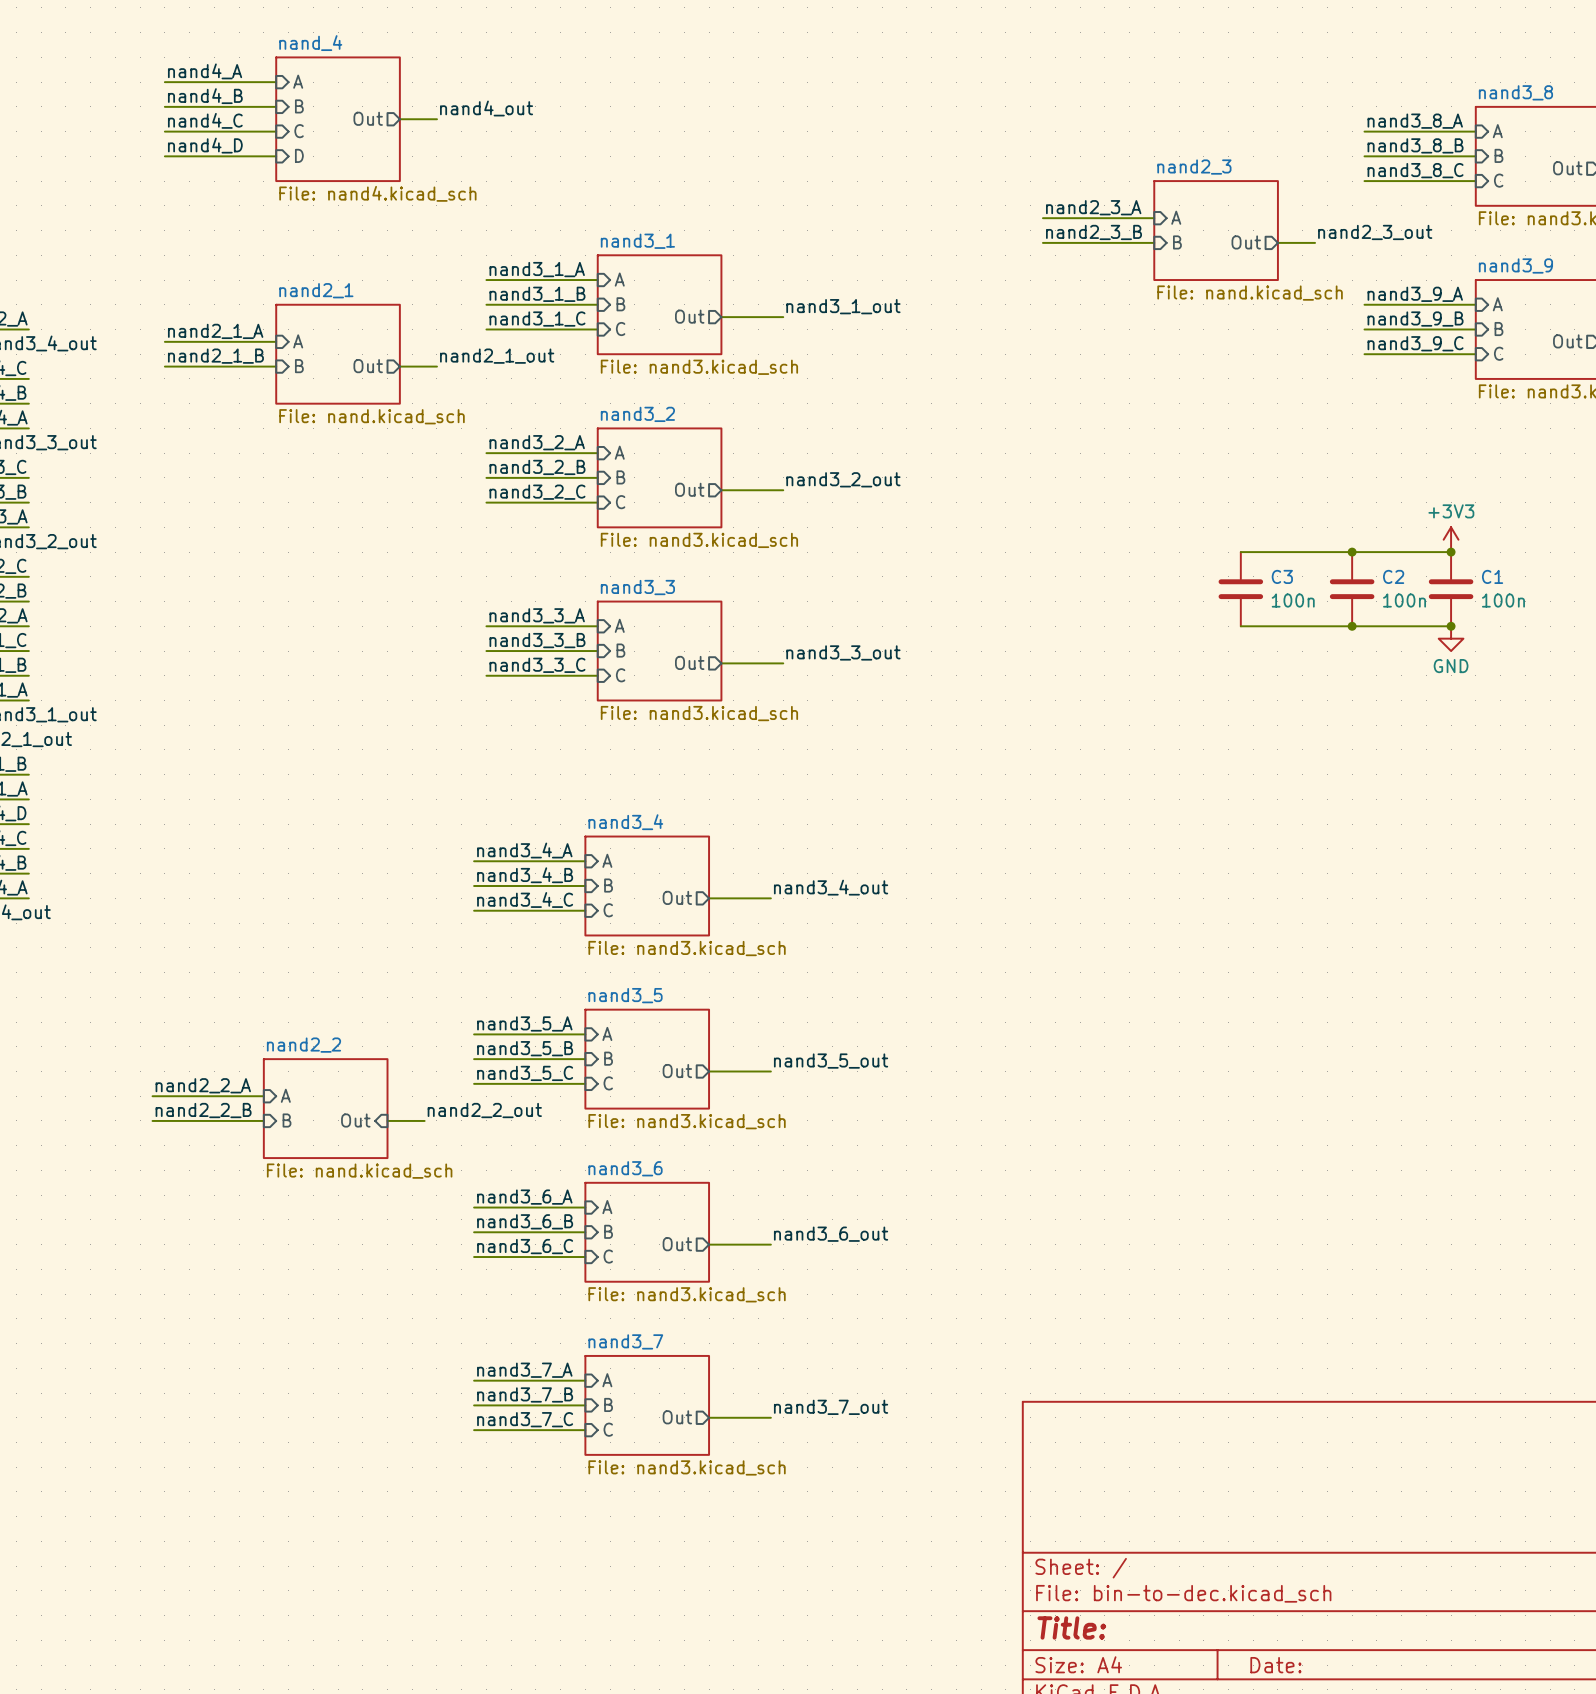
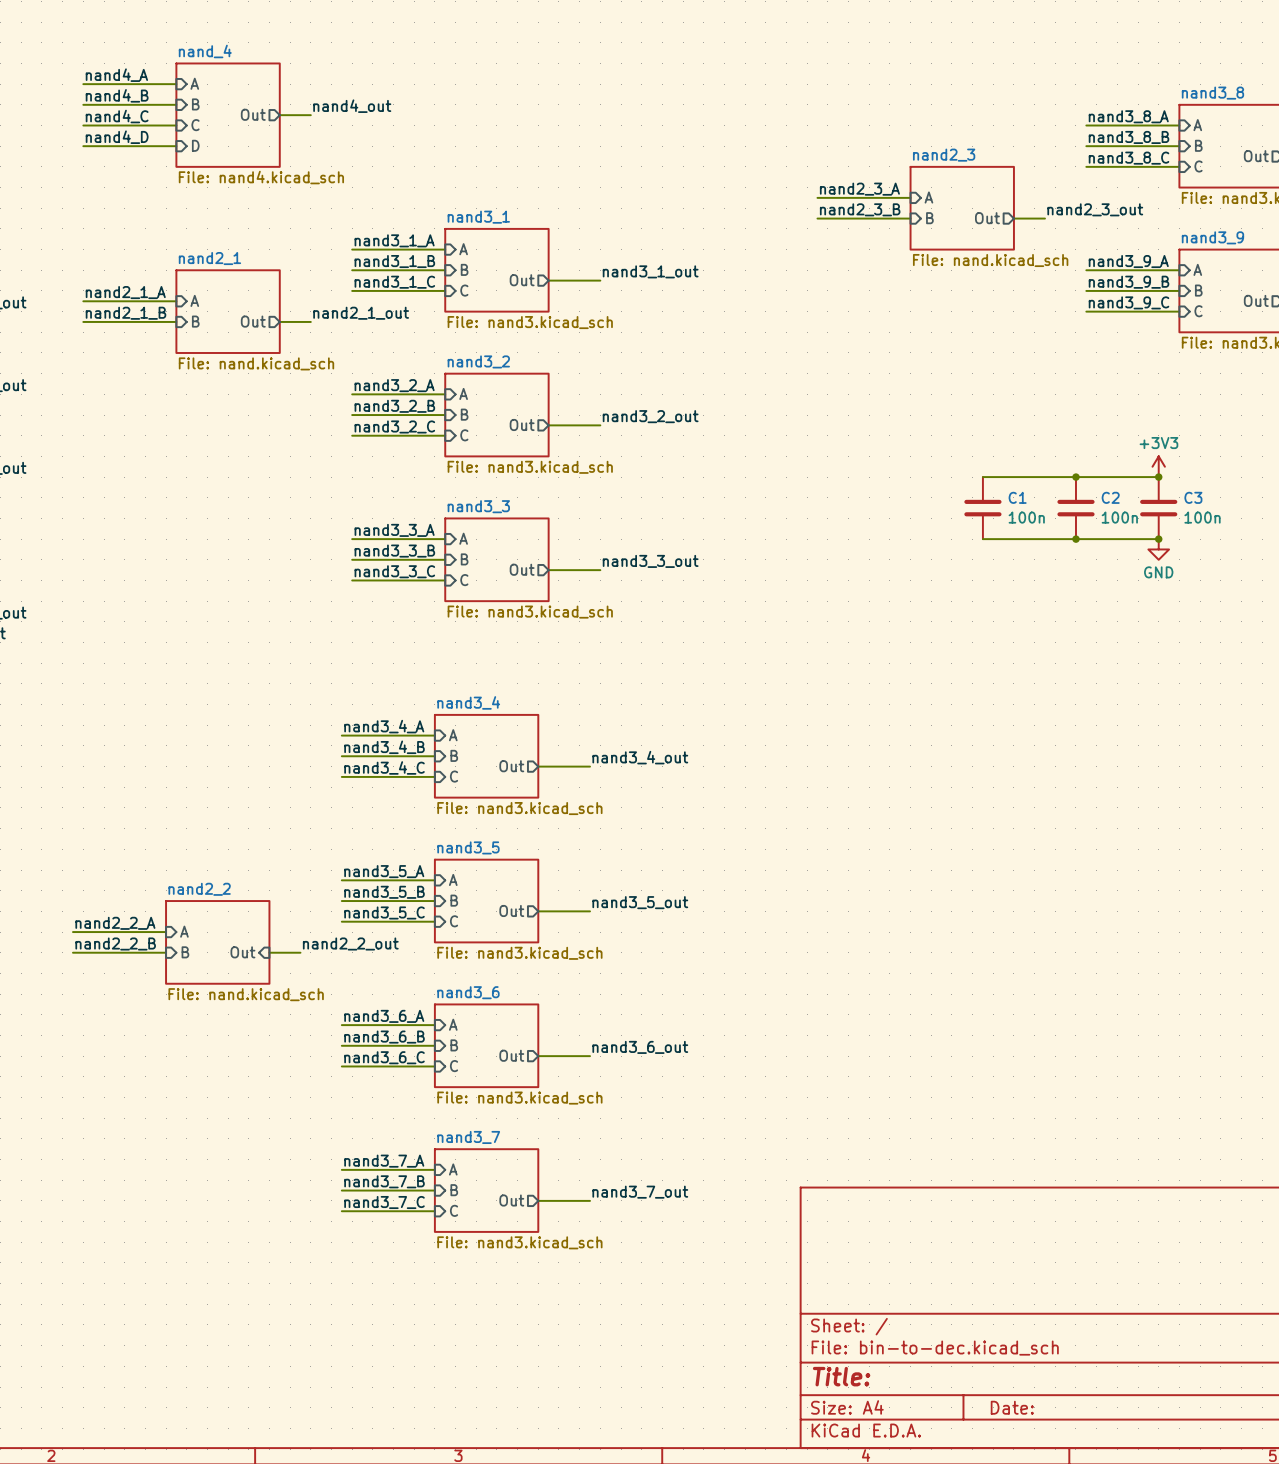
C3 name: C3 (1282, 576) -> C1 (1017, 497)
C1 name: C1 (1492, 576) -> C3 (1193, 497)

